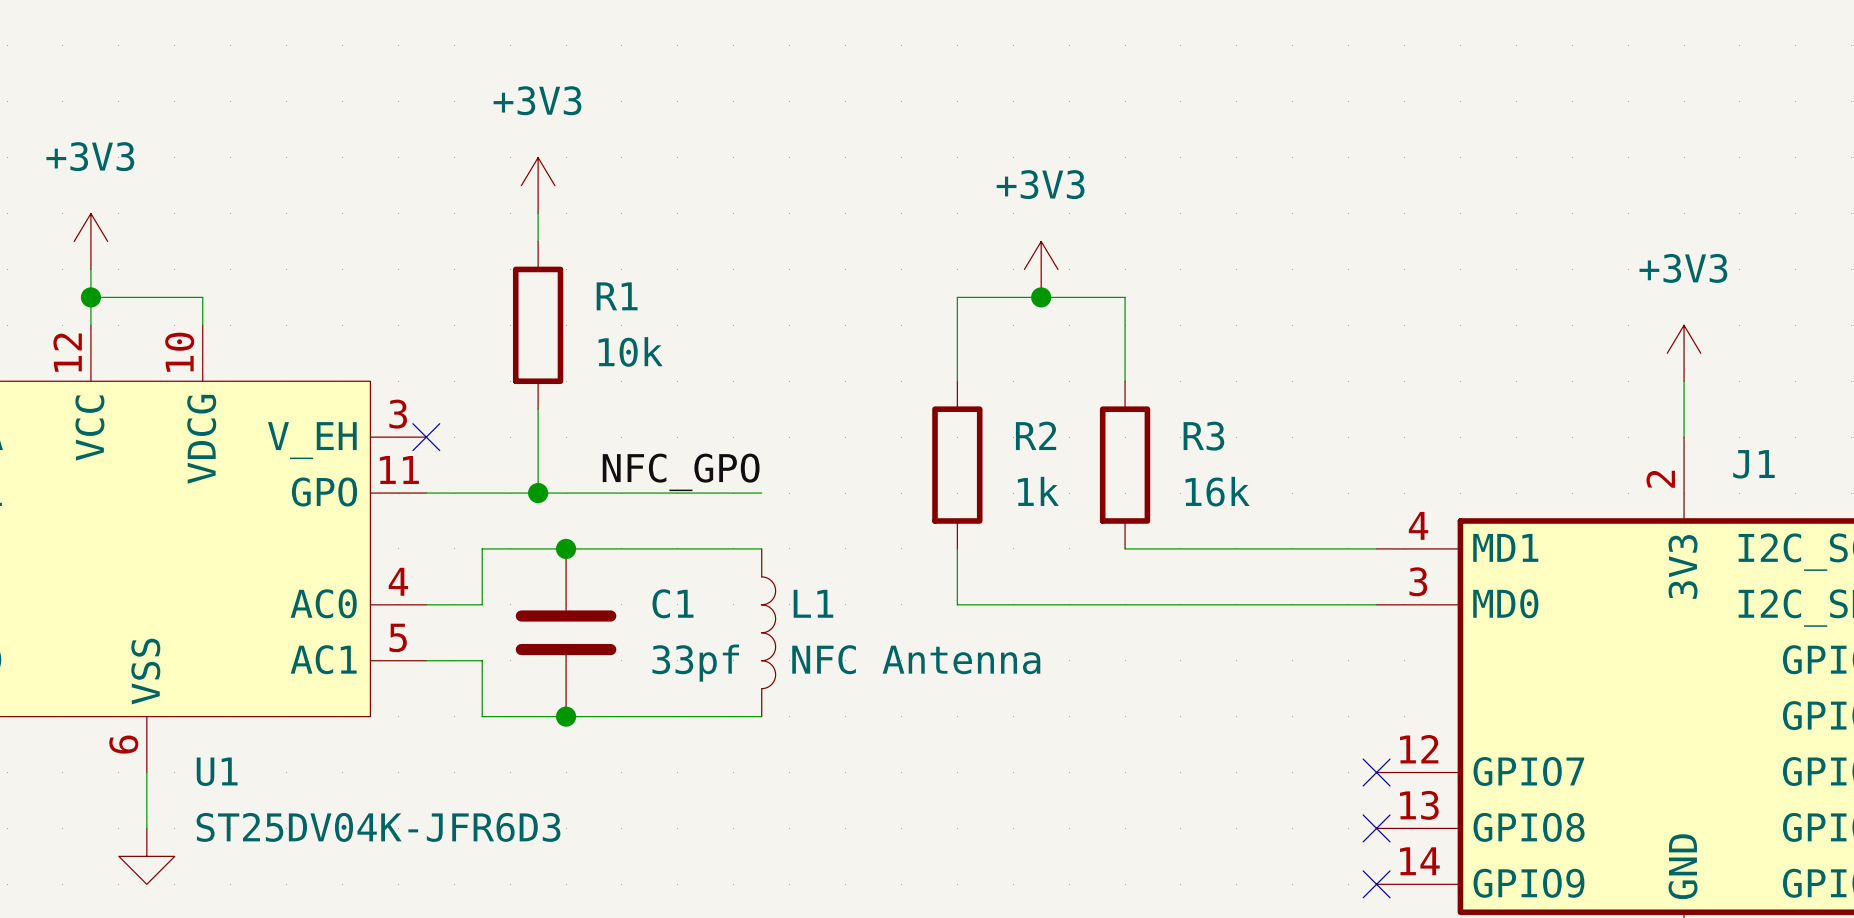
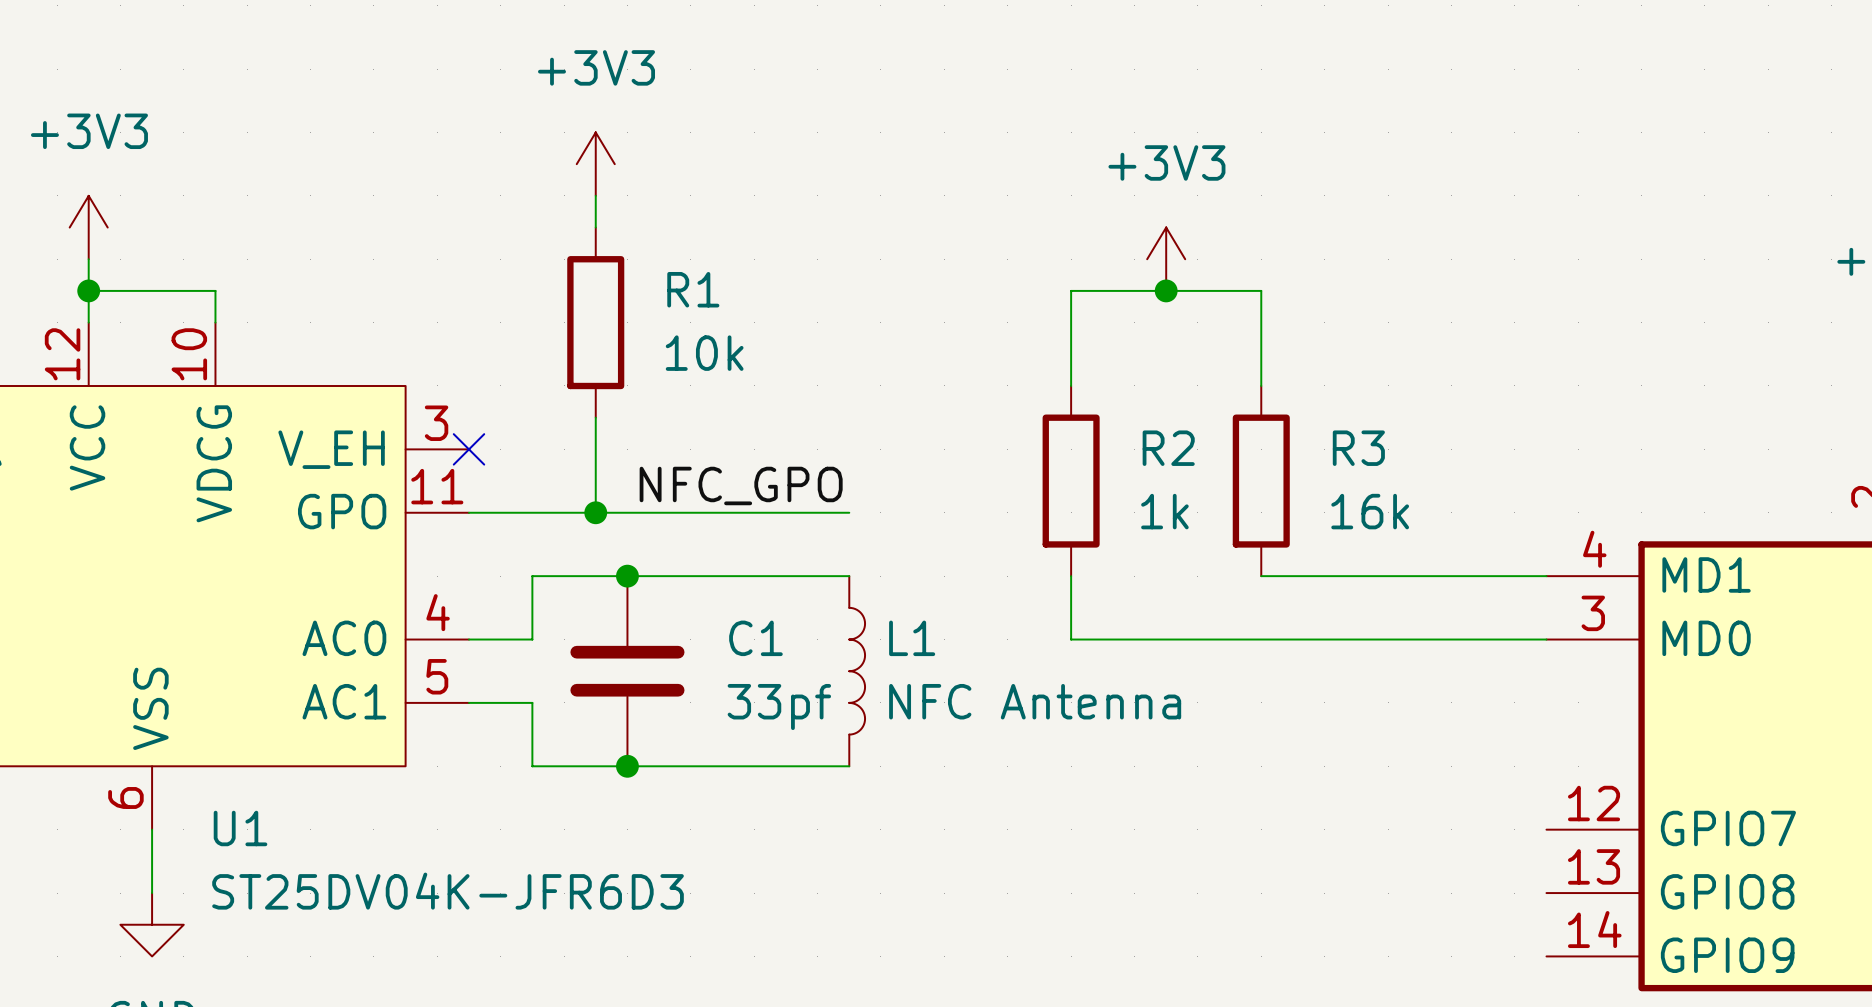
no-connect mark: (1376, 772) -> none
no-connect mark: (1376, 828) -> none
no-connect mark: (1376, 884) -> none

